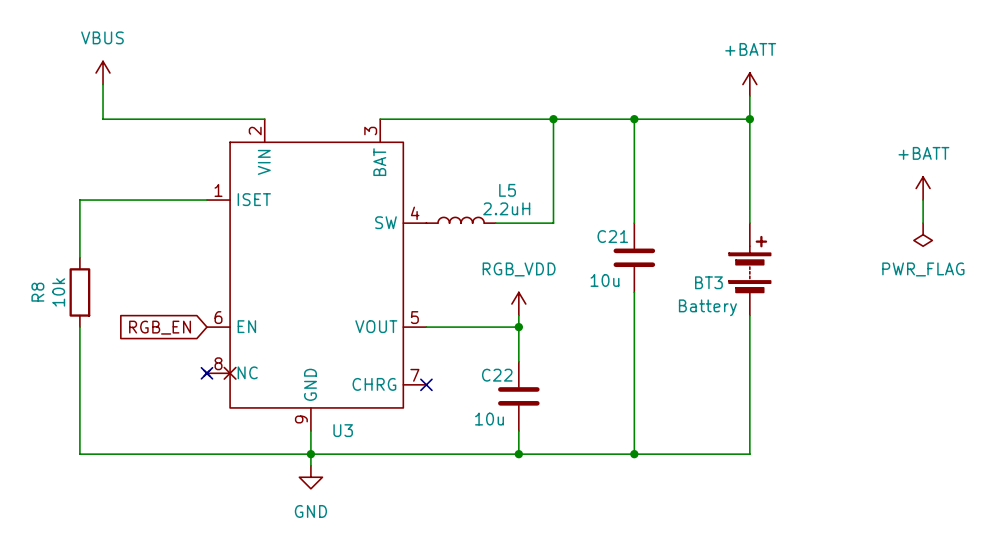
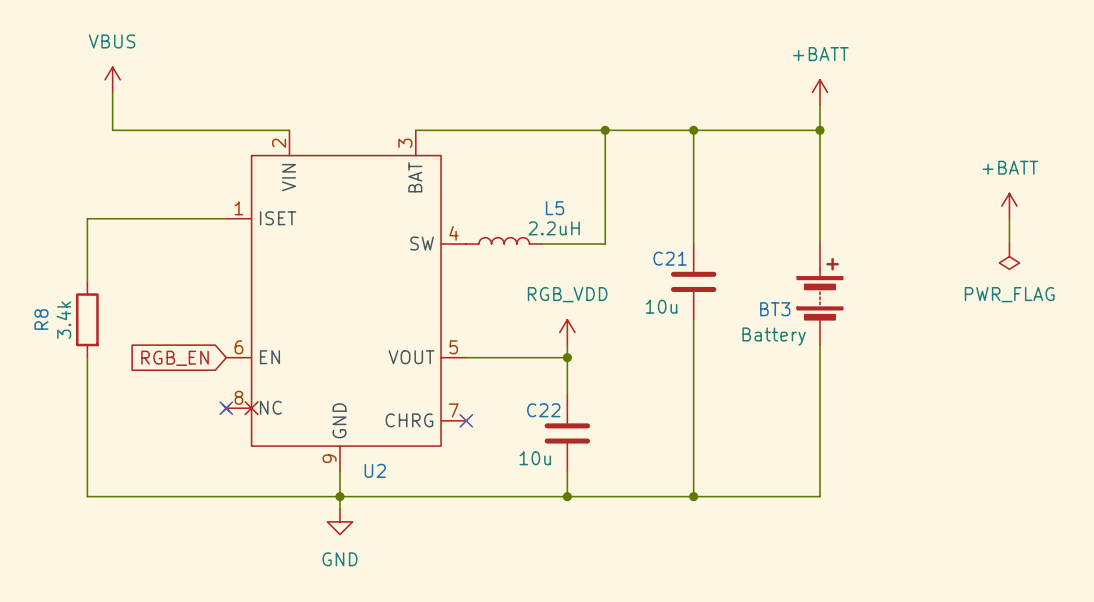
R8 value: 10k (58, 292) -> 3.4k (63, 320)
U3 name: U3 (343, 430) -> U2 (375, 470)

